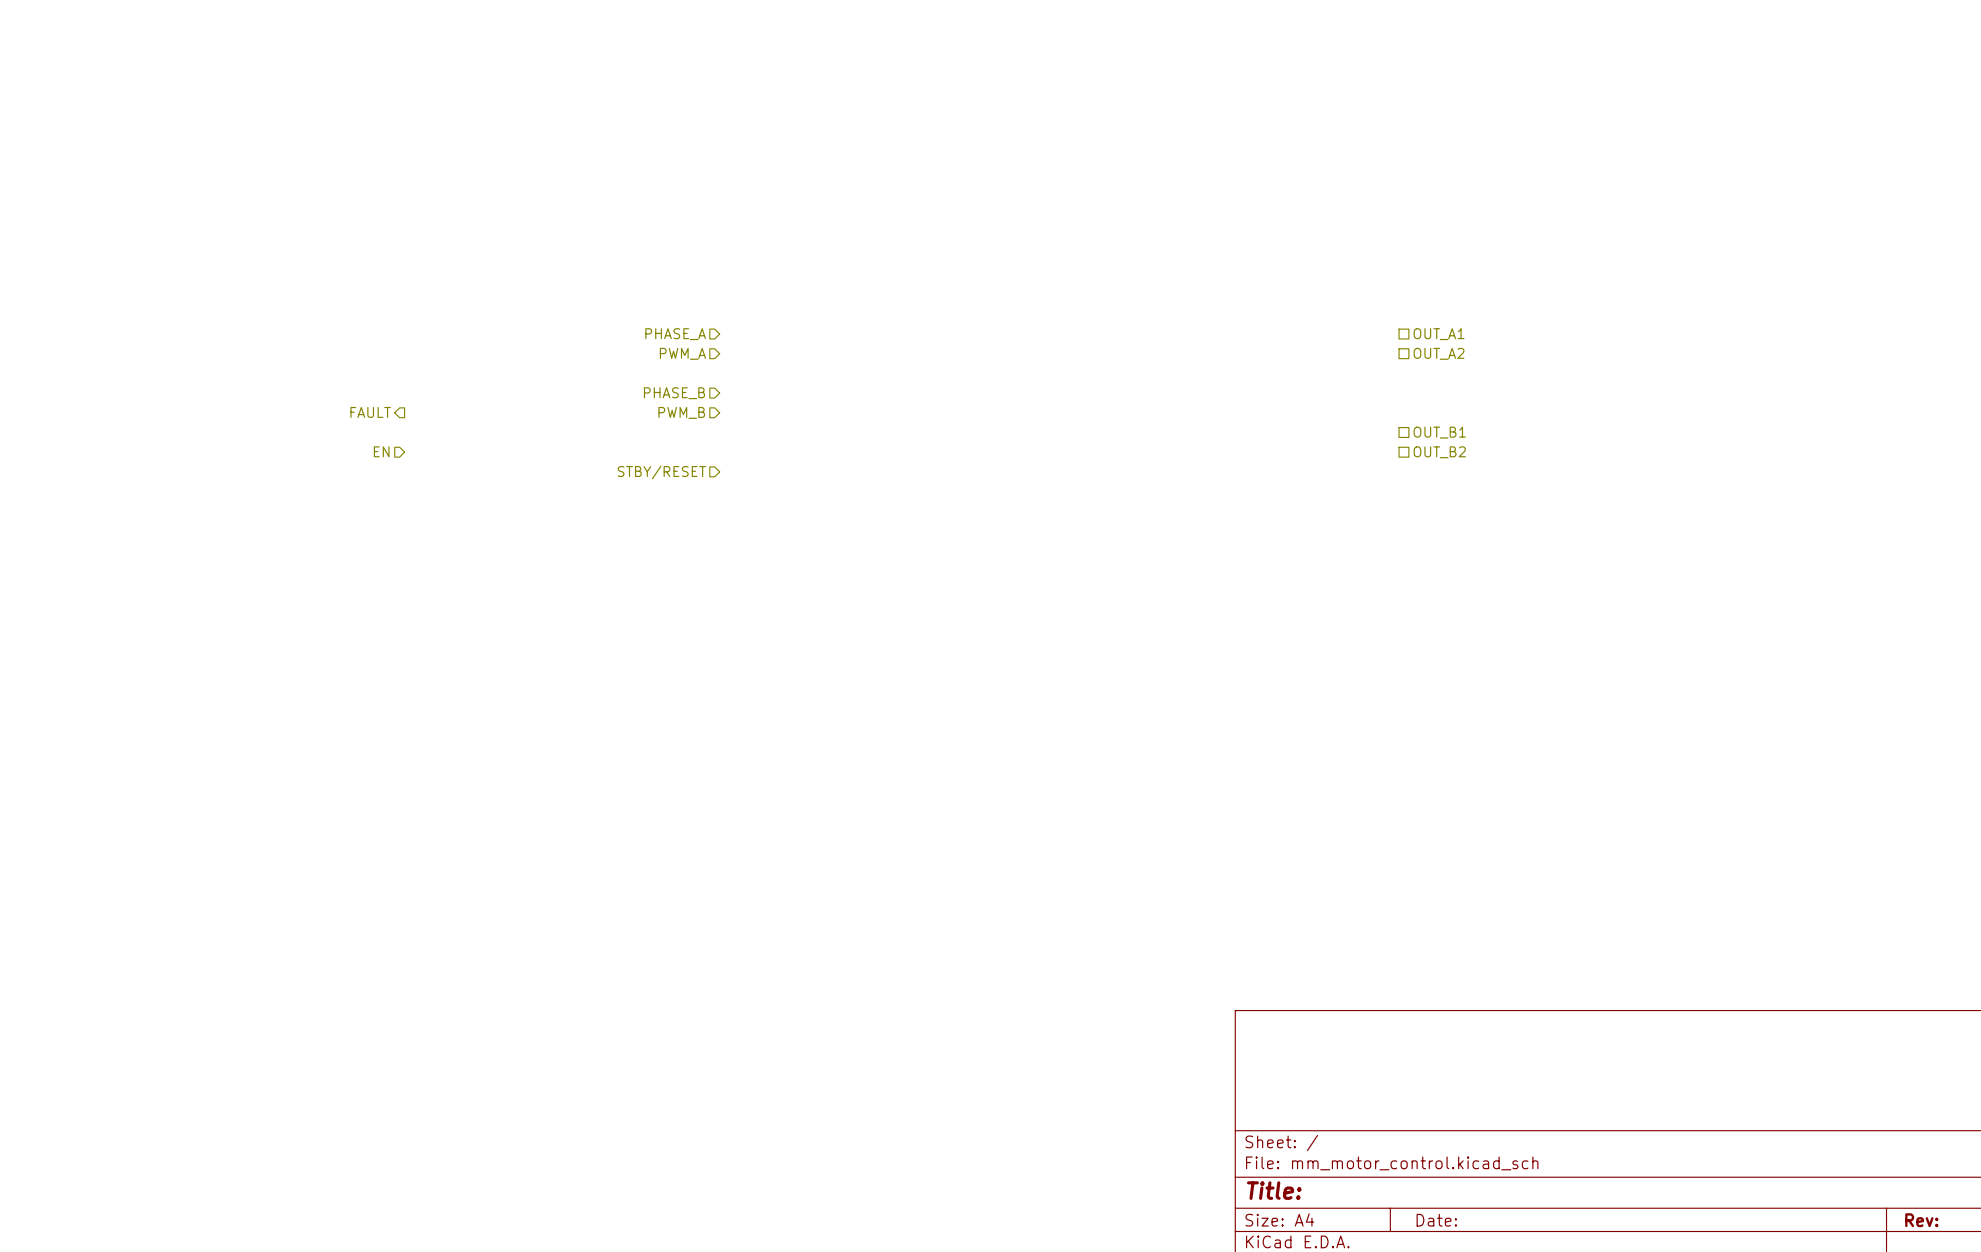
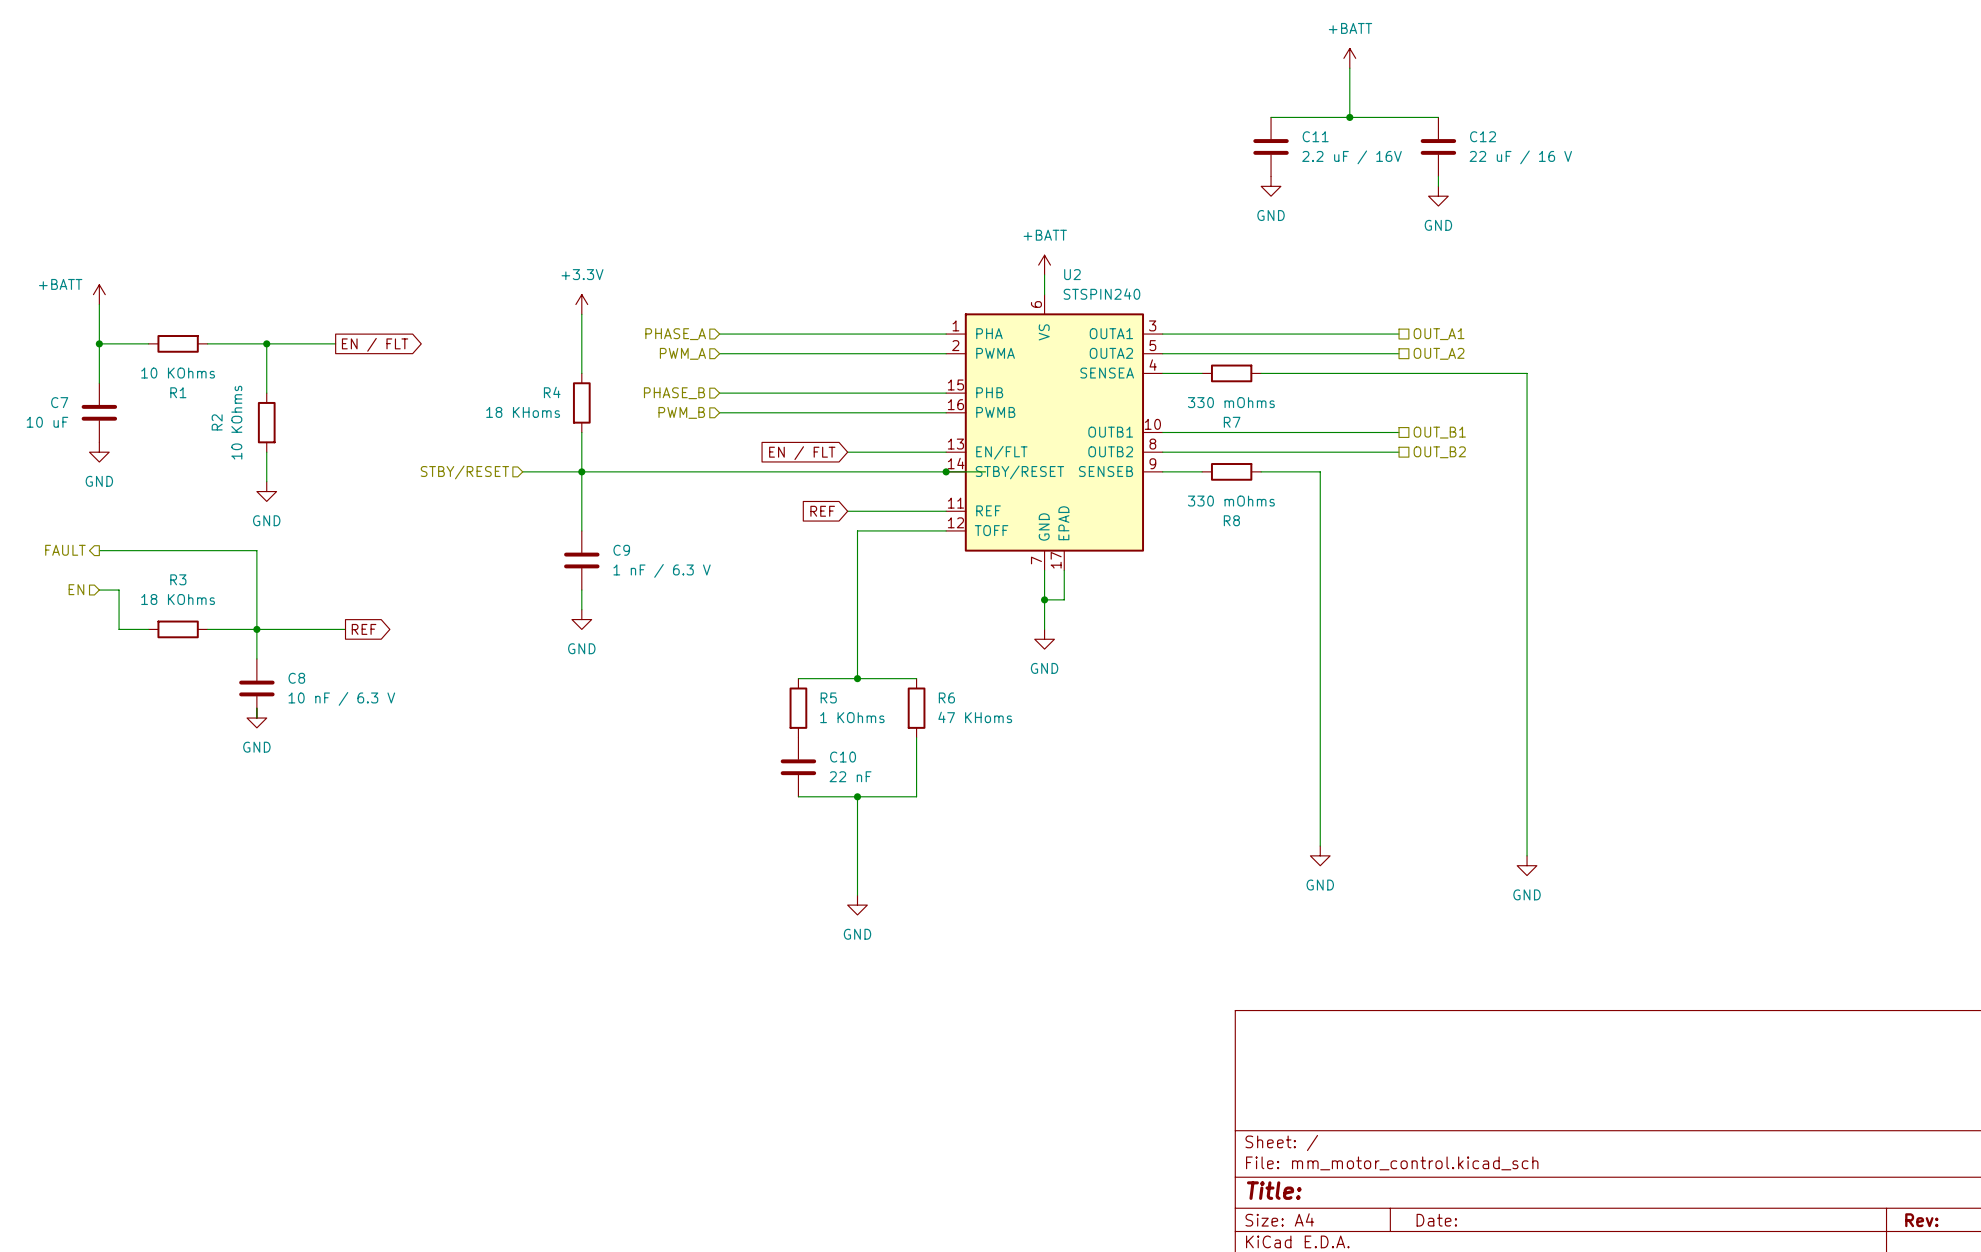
power symbol: none -> +BATT (1349, 58)
wire: none -> (1349, 68) (1349, 117)
wire: none -> (1271, 117) (1438, 117)
junction: none -> (1349, 117)
C11: none -> 2.2 uF / 16V (1271, 146)
C12: none -> 22 uF / 16 V (1438, 146)
wire: none -> (1438, 176) (1438, 186)
power symbol: none -> GND (1271, 186)
power symbol: none -> GND (1438, 196)
power symbol: none -> +BATT (1044, 265)
wire: none -> (1044, 274) (1044, 294)
power symbol: none -> +BATT (99, 294)
wire: none -> (99, 304) (99, 383)
power symbol: none -> +3.3V (581, 304)
wire: none -> (581, 314) (581, 373)
wire: none -> (719, 334) (946, 334)
wire: none -> (1162, 334) (1399, 334)
wire: none -> (99, 343) (148, 343)
junction: none -> (99, 343)
R1: none -> 10 KOhms (178, 343)
wire: none -> (207, 343) (335, 343)
wire: none -> (266, 343) (266, 393)
junction: none -> (266, 343)
global label: none -> EN / FLT (375, 344)
wire: none -> (719, 353) (946, 353)
wire: none -> (1162, 353) (1399, 353)
wire: none -> (1162, 373) (1202, 373)
R7: none -> 330 mOhms (1231, 373)
wire: none -> (1261, 373) (1527, 373) (1527, 855)
wire: none -> (719, 393) (946, 393)
R4: none -> 18 KHoms (581, 402)
C7: none -> 10 uF (99, 412)
hierarchical label: FAULT (370, 412) -> none
wire: none -> (719, 412) (946, 412)
R2: none -> 10 KOhms (266, 422)
wire: none -> (581, 432) (581, 530)
U2: none -> STSPIN240 (1054, 432)
wire: none -> (1162, 432) (1399, 432)
hierarchical label: EN (381, 451) -> none
power symbol: none -> GND (99, 452)
wire: none -> (266, 452) (266, 481)
wire: none -> (847, 452) (946, 452)
wire: none -> (1162, 452) (1399, 452)
global label: none -> EN / FLT (802, 453)
wire: none -> (522, 471) (985, 471)
junction: none -> (581, 471)
junction: none -> (946, 471)
wire: none -> (1162, 471) (1202, 471)
R8: none -> 330 mOhms (1231, 471)
wire: none -> (1261, 471) (1320, 471) (1320, 846)
hierarchical label: none -> STBY/RESET (464, 472)
hierarchical label: STBY/RESET (661, 472) -> none
power symbol: none -> GND (266, 491)
global label: none -> REF (822, 511)
wire: none -> (847, 511) (946, 511)
wire: none -> (946, 530) (857, 530) (857, 678)
hierarchical label: none -> FAULT (65, 550)
wire: none -> (99, 550) (256, 550) (256, 658)
C9: none -> 1 nF / 6.3 V (581, 560)
wire: none -> (1044, 570) (1044, 629)
wire: none -> (1064, 570) (1064, 599) (1044, 599)
hierarchical label: none -> EN (76, 589)
wire: none -> (99, 590) (119, 590) (119, 629) (148, 629)
wire: none -> (581, 590) (581, 609)
junction: none -> (1044, 599)
power symbol: none -> GND (581, 619)
R3: none -> 18 KOhms (178, 629)
wire: none -> (207, 629) (345, 629)
junction: none -> (256, 629)
global label: none -> REF (364, 629)
power symbol: none -> GND (1044, 639)
wire: none -> (798, 678) (916, 678)
junction: none -> (857, 678)
C8: none -> 10 nF / 6.3 V (256, 688)
wire: none -> (256, 708) (256, 718)
R5: none -> 1 KOhms (798, 708)
R6: none -> 47 KHoms (916, 708)
power symbol: none -> GND (256, 718)
wire: none -> (916, 737) (916, 796) (798, 796)
C10: none -> 22 nF (798, 767)
wire: none -> (857, 796) (857, 895)
junction: none -> (857, 796)
power symbol: none -> GND (1320, 855)
power symbol: none -> GND (1527, 865)
power symbol: none -> GND (857, 905)

